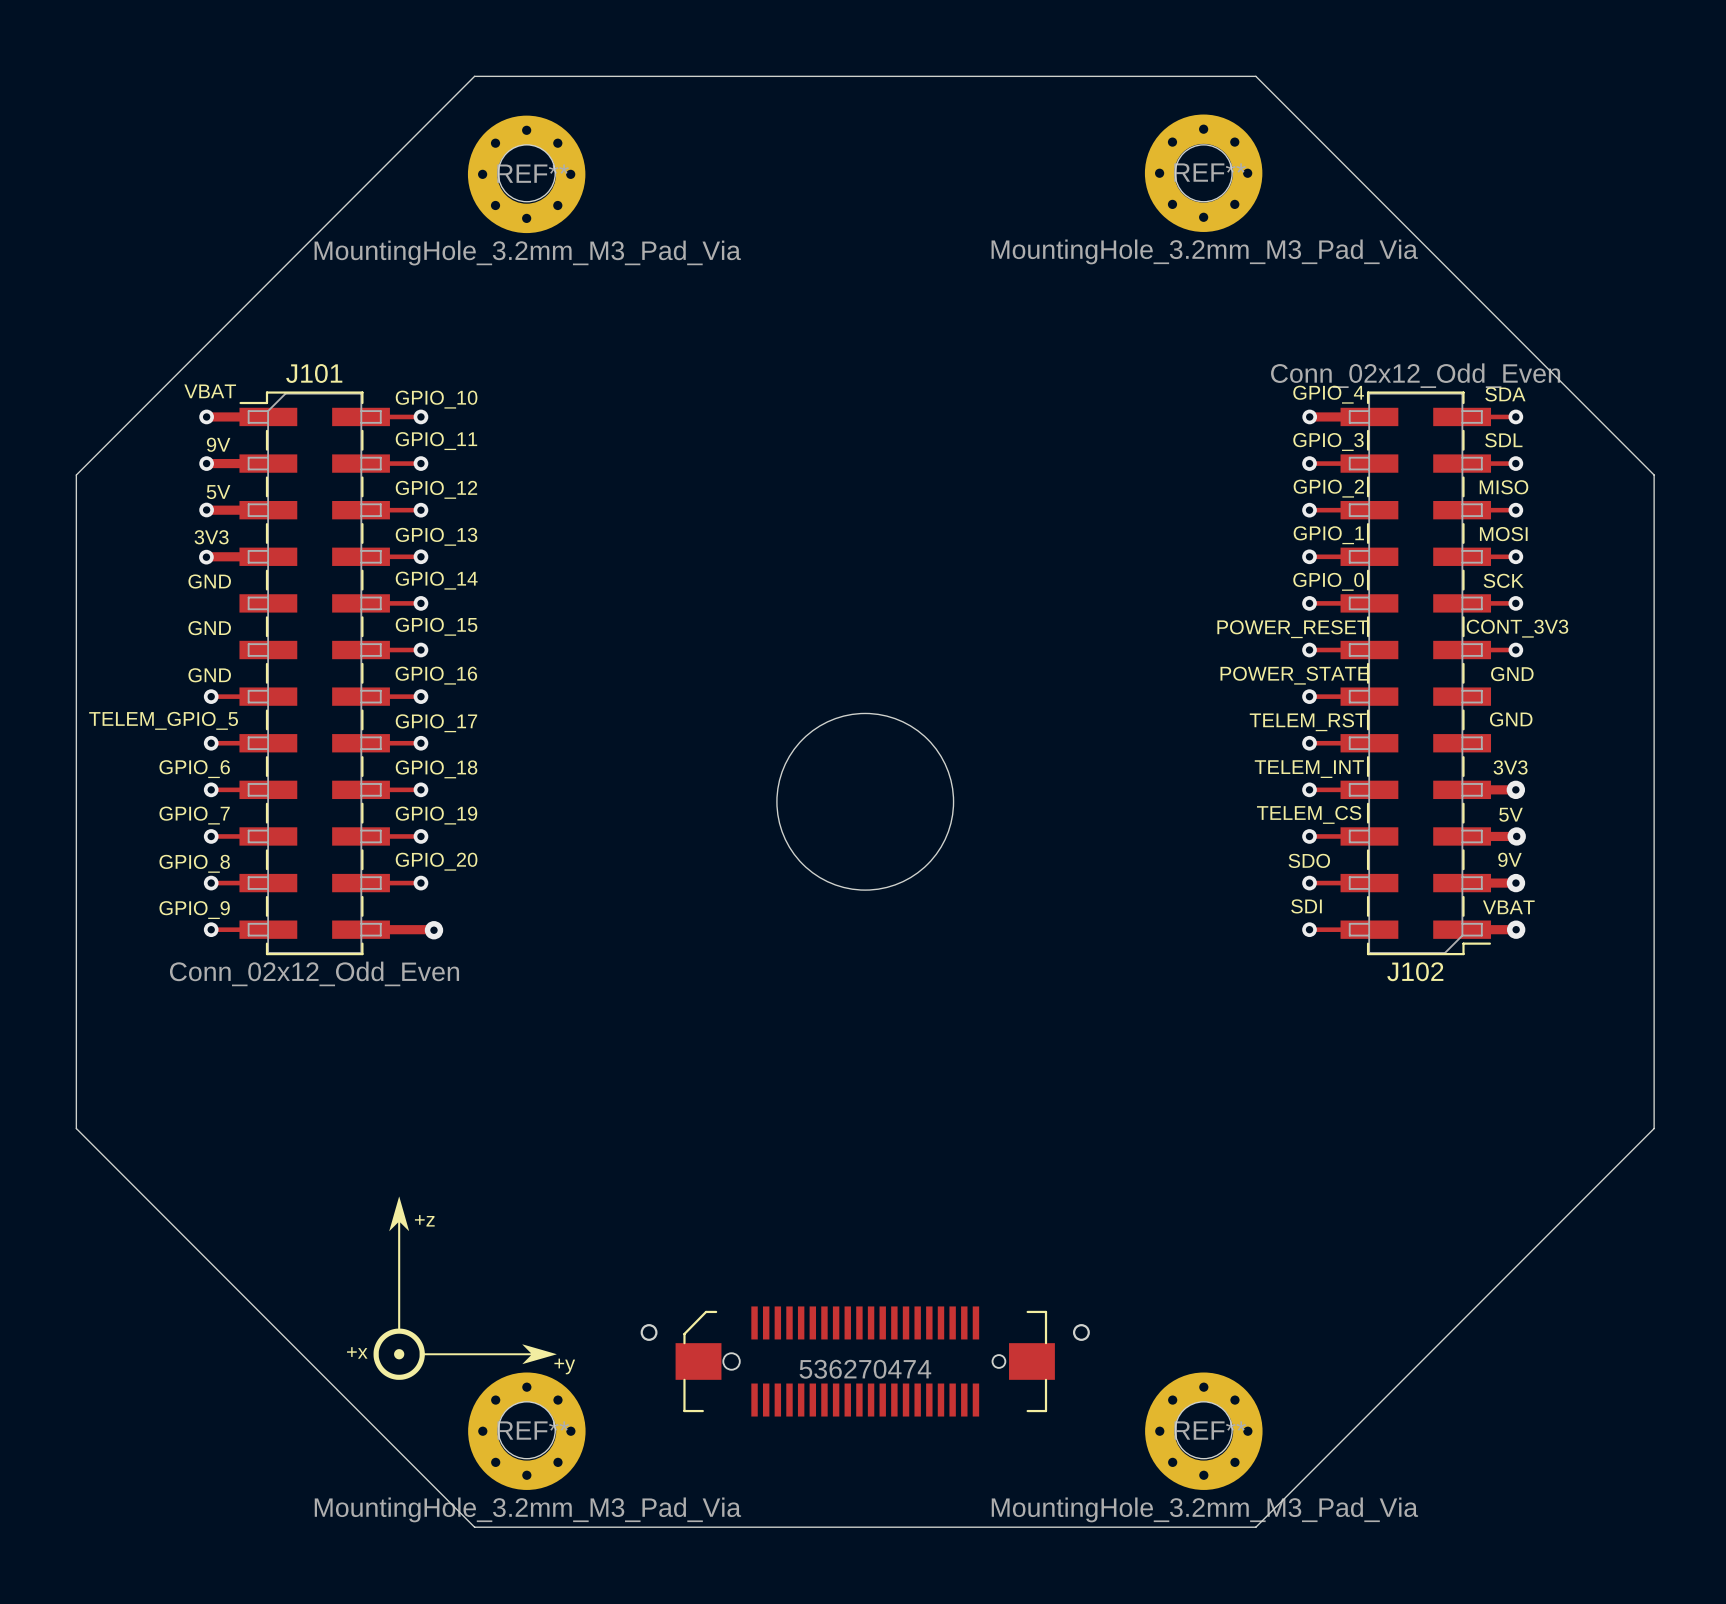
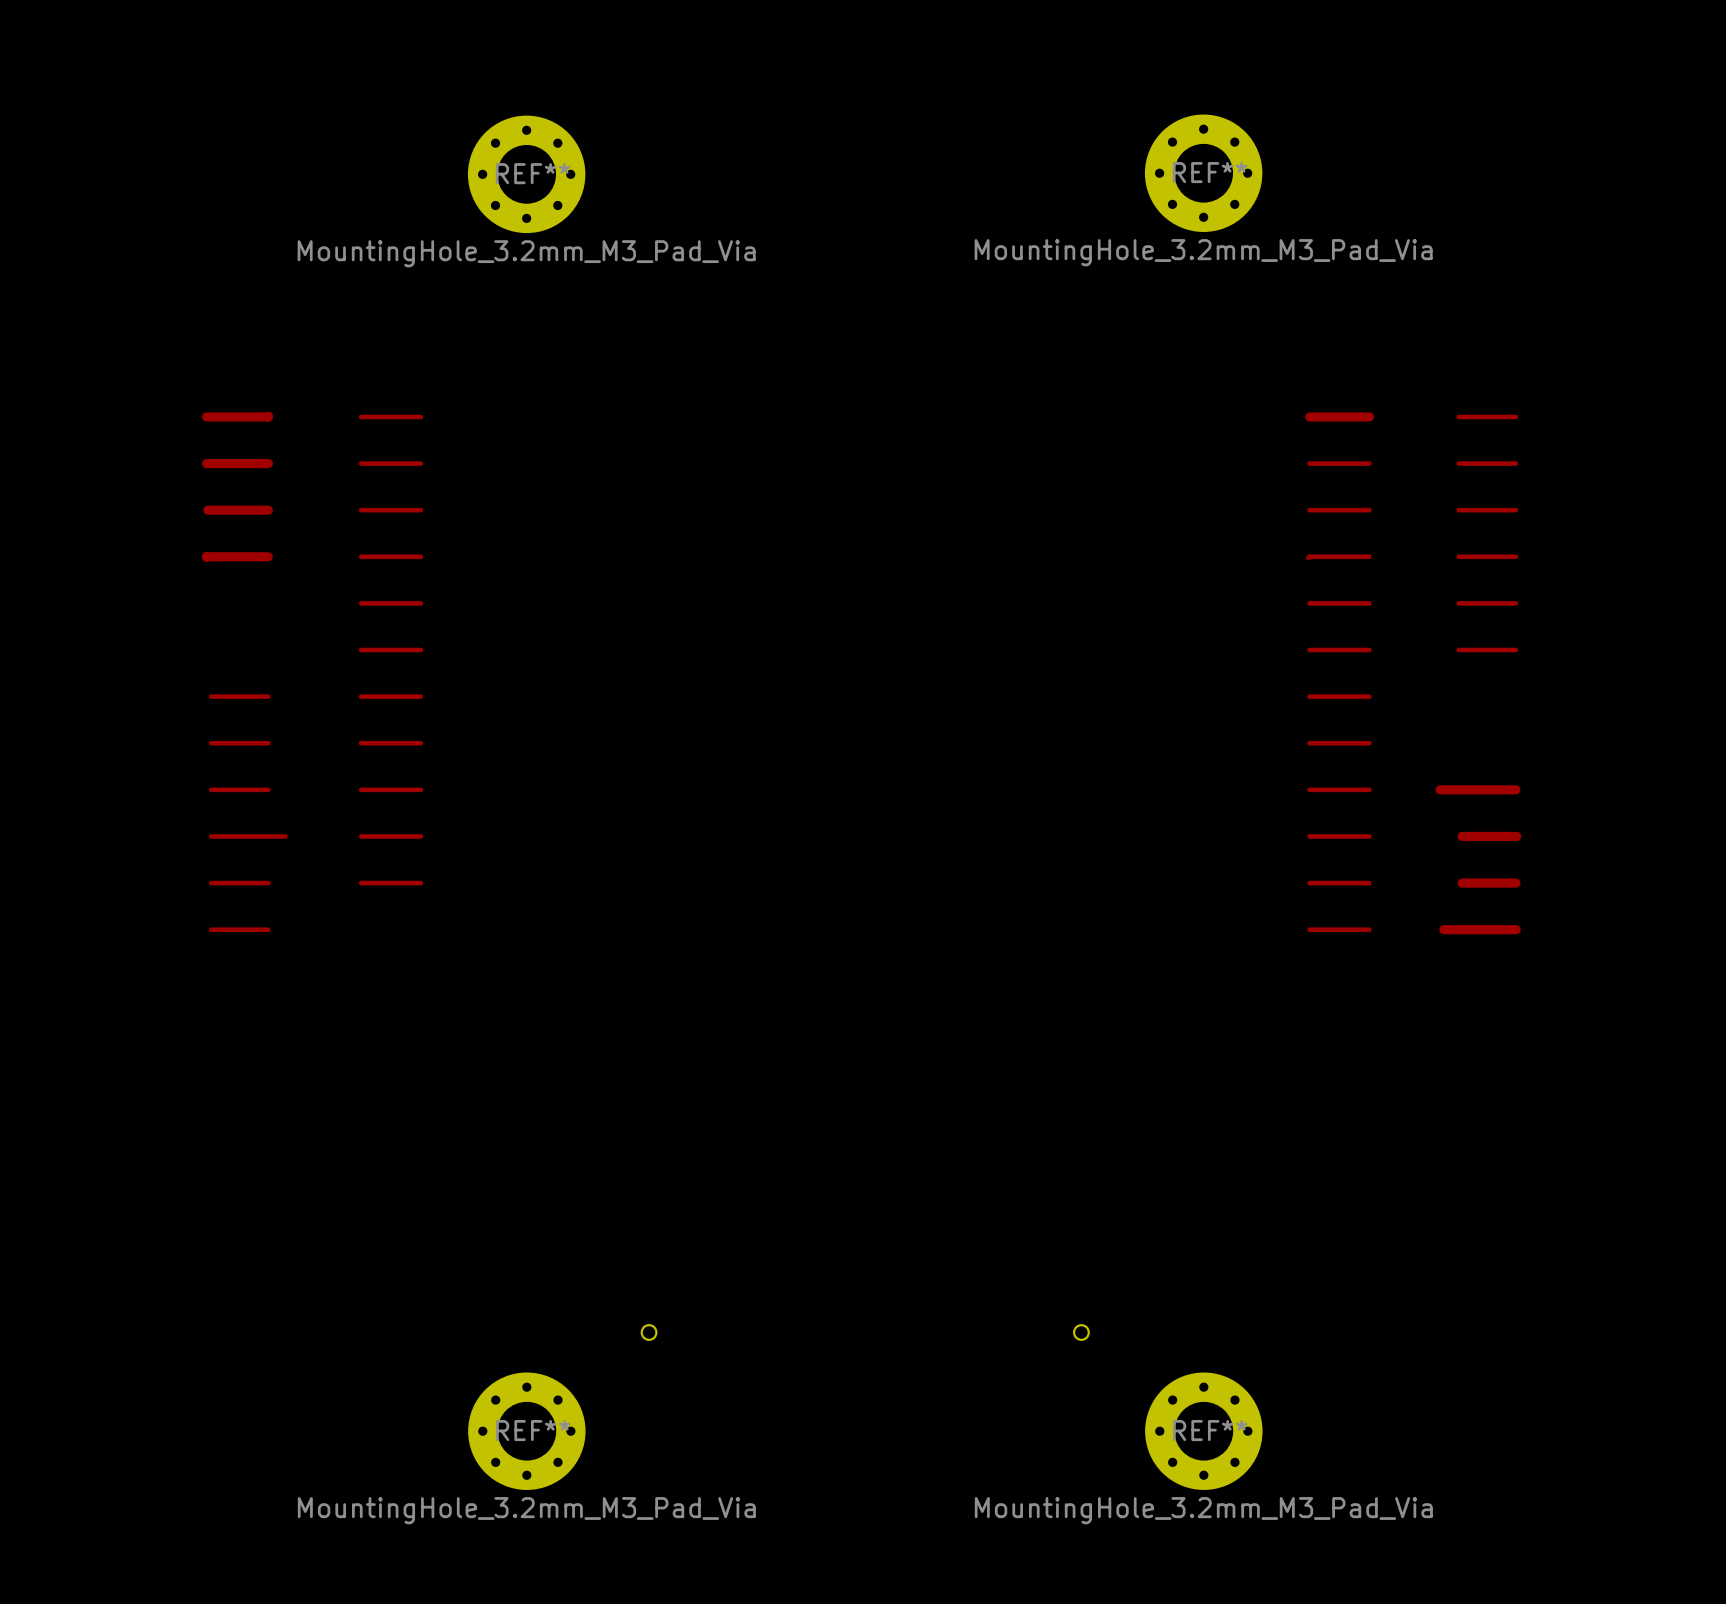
board edge: (474, 76) (76, 475) (76, 1128) (474, 1527) (1255, 1527) (1654, 1128) (1654, 475) (1255, 76) (474, 76) -> none
round board edge: [498, 144, 556, 202] -> none
round board edge: [1175, 144, 1233, 202] -> none
text: VBAT (210, 391) -> none
text: GPIO_4 (1328, 394) -> none
text: SDA (1505, 394) -> none
text: GPIO_10 (436, 399) -> none
via: (206, 416) -> none
via: (420, 416) -> none
via: (1309, 416) -> none
via: (1515, 416) -> none
text: SDL (1503, 440) -> none
text: GPIO_11 (436, 441) -> none
text: GPIO_3 (1328, 441) -> none
text: 9V (218, 444) -> none
via: (206, 463) -> none
via: (420, 463) -> none
via: (1309, 463) -> none
via: (1515, 463) -> none
text: MISO (1504, 487) -> none
text: GPIO_2 (1328, 488) -> none
text: GPIO_12 (436, 489) -> none
text: 5V (218, 492) -> none
via: (206, 509) -> none
via: (420, 510) -> none
via: (1309, 510) -> none
via: (1515, 510) -> none
text: MOSI (1503, 534) -> none
text: GPIO_1 (1328, 535) -> none
text: GPIO_13 (436, 536) -> none
text: 3V3 (211, 537) -> none
via: (420, 556) -> none
via: (1309, 556) -> none
via: (1515, 556) -> none
via: (206, 557) -> none
text: GPIO_14 (436, 580) -> none
text: SCK (1503, 580) -> none
text: GND (209, 581) -> none
text: GPIO_0 (1328, 581) -> none
via: (420, 603) -> none
via: (1309, 603) -> none
via: (1515, 603) -> none
text: GPIO_15 (436, 626) -> none
text: GND (209, 628) -> none
text: CONT_3V3 (1517, 628) -> none
text: POWER_RESET (1293, 629) -> none
via: (420, 650) -> none
via: (1309, 650) -> none
via: (1515, 650) -> none
J101: Conn_02x12_Odd_Even (314, 673) -> none
J102: Conn_02x12_Odd_Even (1415, 673) -> none
text: GND (1512, 674) -> none
text: GND (209, 675) -> none
text: GPIO_16 (436, 675) -> none
text: POWER_STATE (1294, 675) -> none
via: (211, 696) -> none
via: (420, 696) -> none
via: (1309, 696) -> none
round board edge: [776, 713, 954, 891] -> none
text: GND (1511, 719) -> none
text: TELEM_GPIO_5 (163, 720) -> none
text: TELEM_RST (1308, 722) -> none
text: GPIO_17 (436, 723) -> none
via: (211, 743) -> none
via: (420, 743) -> none
via: (1309, 743) -> none
text: 3V3 (1510, 767) -> none
text: GPIO_6 (194, 769) -> none
text: GPIO_18 (436, 769) -> none
text: TELEM_INT (1309, 769) -> none
via: (211, 789) -> none
via: (420, 789) -> none
via: (1309, 789) -> none
via: (1515, 789) -> none
text: TELEM_CS (1309, 814) -> none
text: 5V (1511, 814) -> none
text: GPIO_7 (194, 815) -> none
text: GPIO_19 (436, 815) -> none
via: (211, 836) -> none
via: (420, 836) -> none
via: (1309, 836) -> none
via: (1516, 836) -> none
text: 9V (1509, 859) -> none
text: SDO (1309, 860) -> none
text: GPIO_20 (436, 861) -> none
text: GPIO_8 (194, 863) -> none
via: (211, 883) -> none
via: (420, 883) -> none
via: (1309, 883) -> none
via: (1515, 883) -> none
text: SDI (1306, 906) -> none
text: VBAT (1508, 907) -> none
text: GPIO_9 (194, 910) -> none
via: (211, 929) -> none
track: (361, 929) (433, 930) -> none
via: (1309, 929) -> none
via: (1516, 929) -> none
via: (433, 930) -> none
drawing: [373, 1196, 557, 1380] -> none
text: +z (424, 1220) -> none
text: +x (357, 1352) -> none
part: 536270474 (865, 1361) -> none
text: +y (564, 1366) -> none
round board edge: [498, 1401, 556, 1459] -> none
round board edge: [1175, 1401, 1233, 1459] -> none

